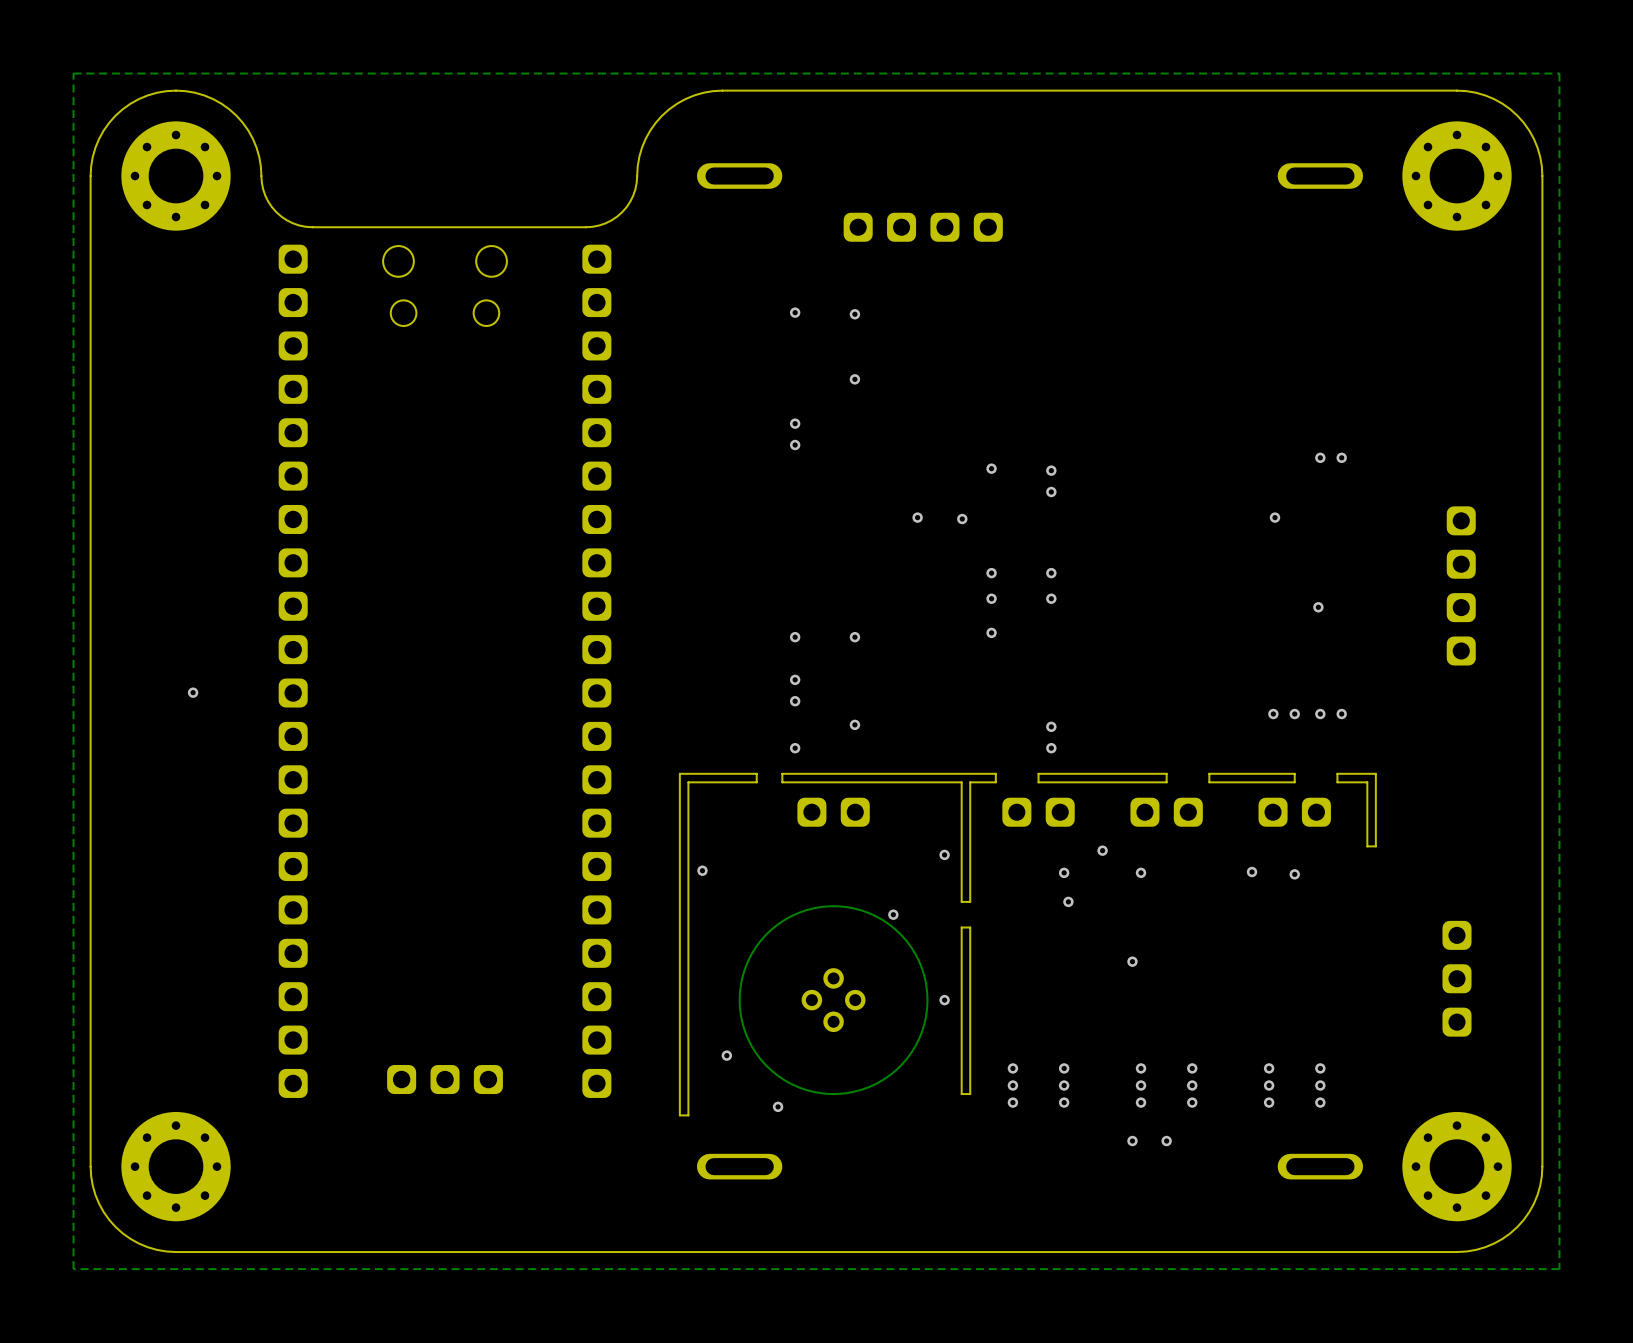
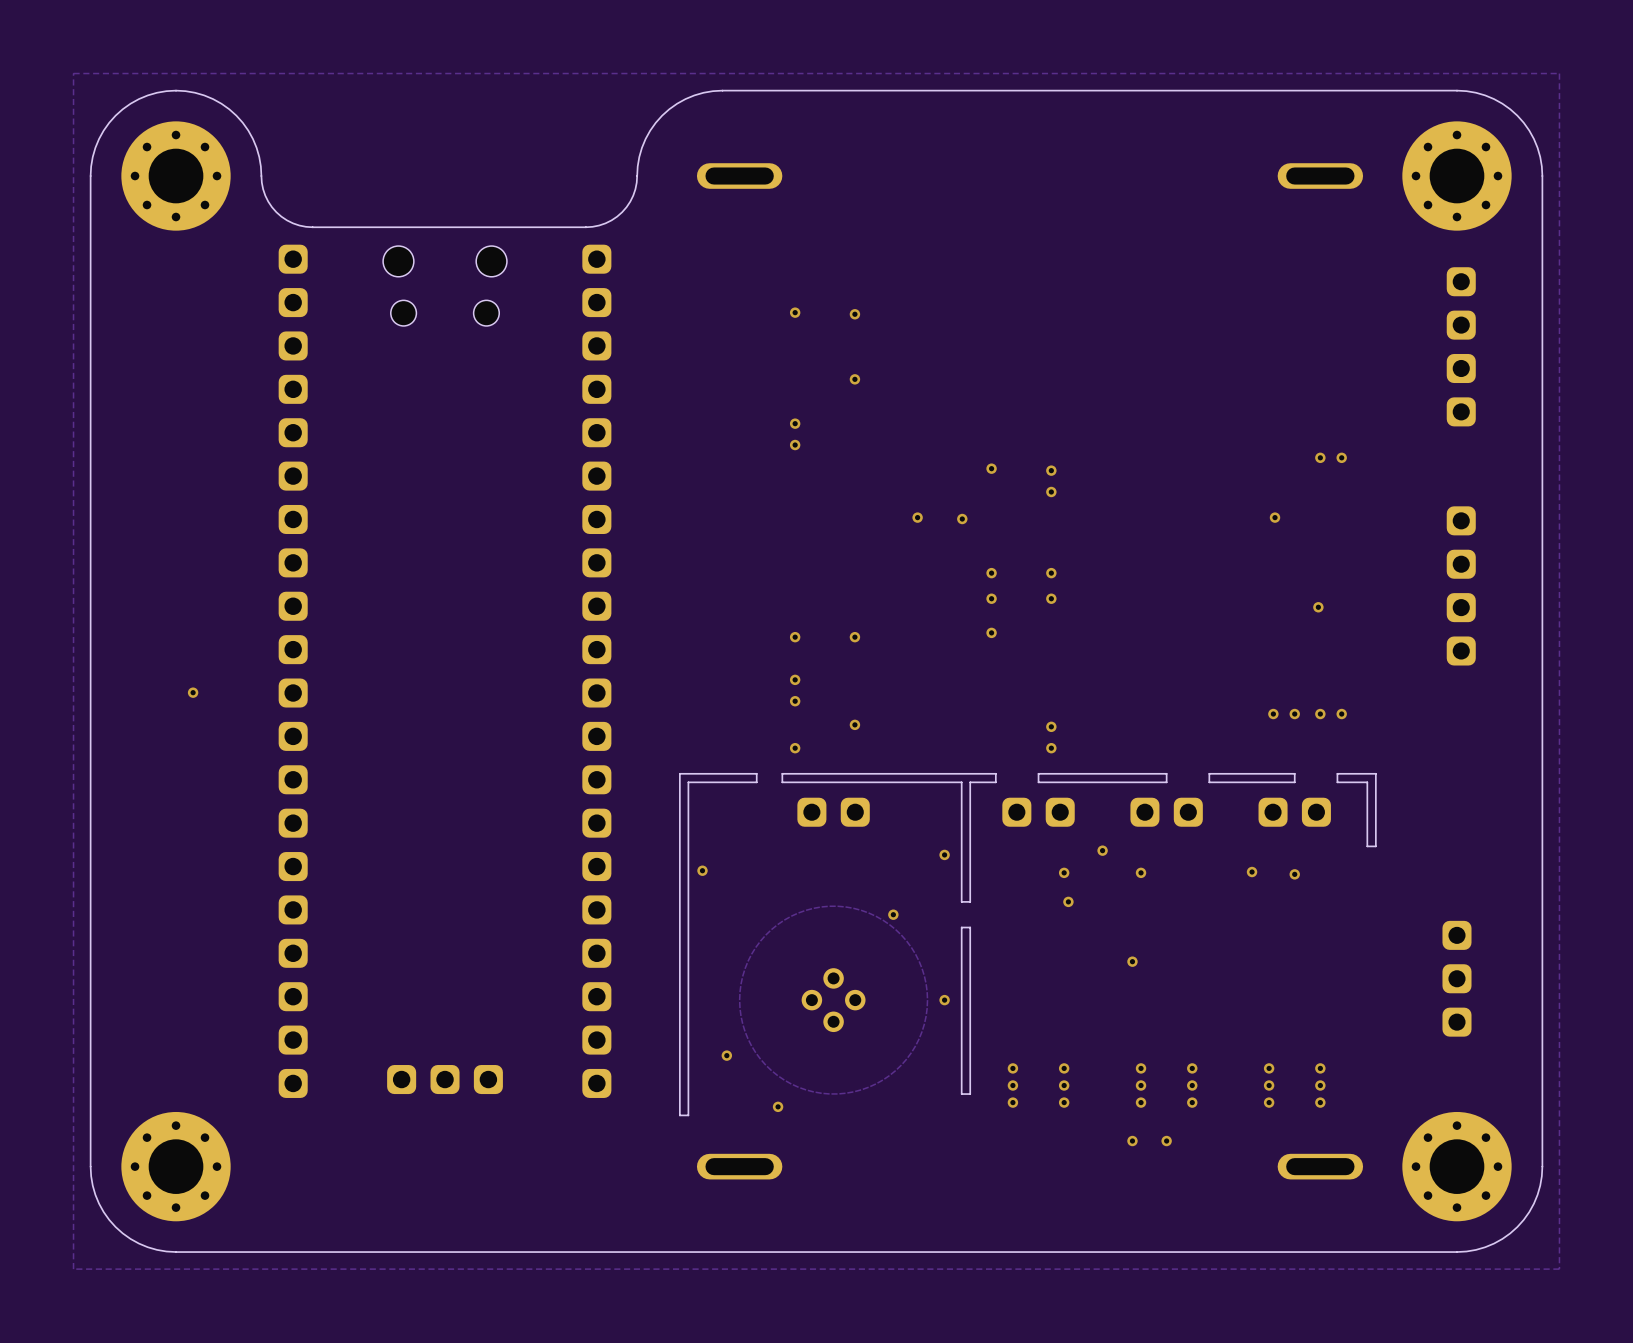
part: (923, 227) -> none
part: none -> (1461, 346)

